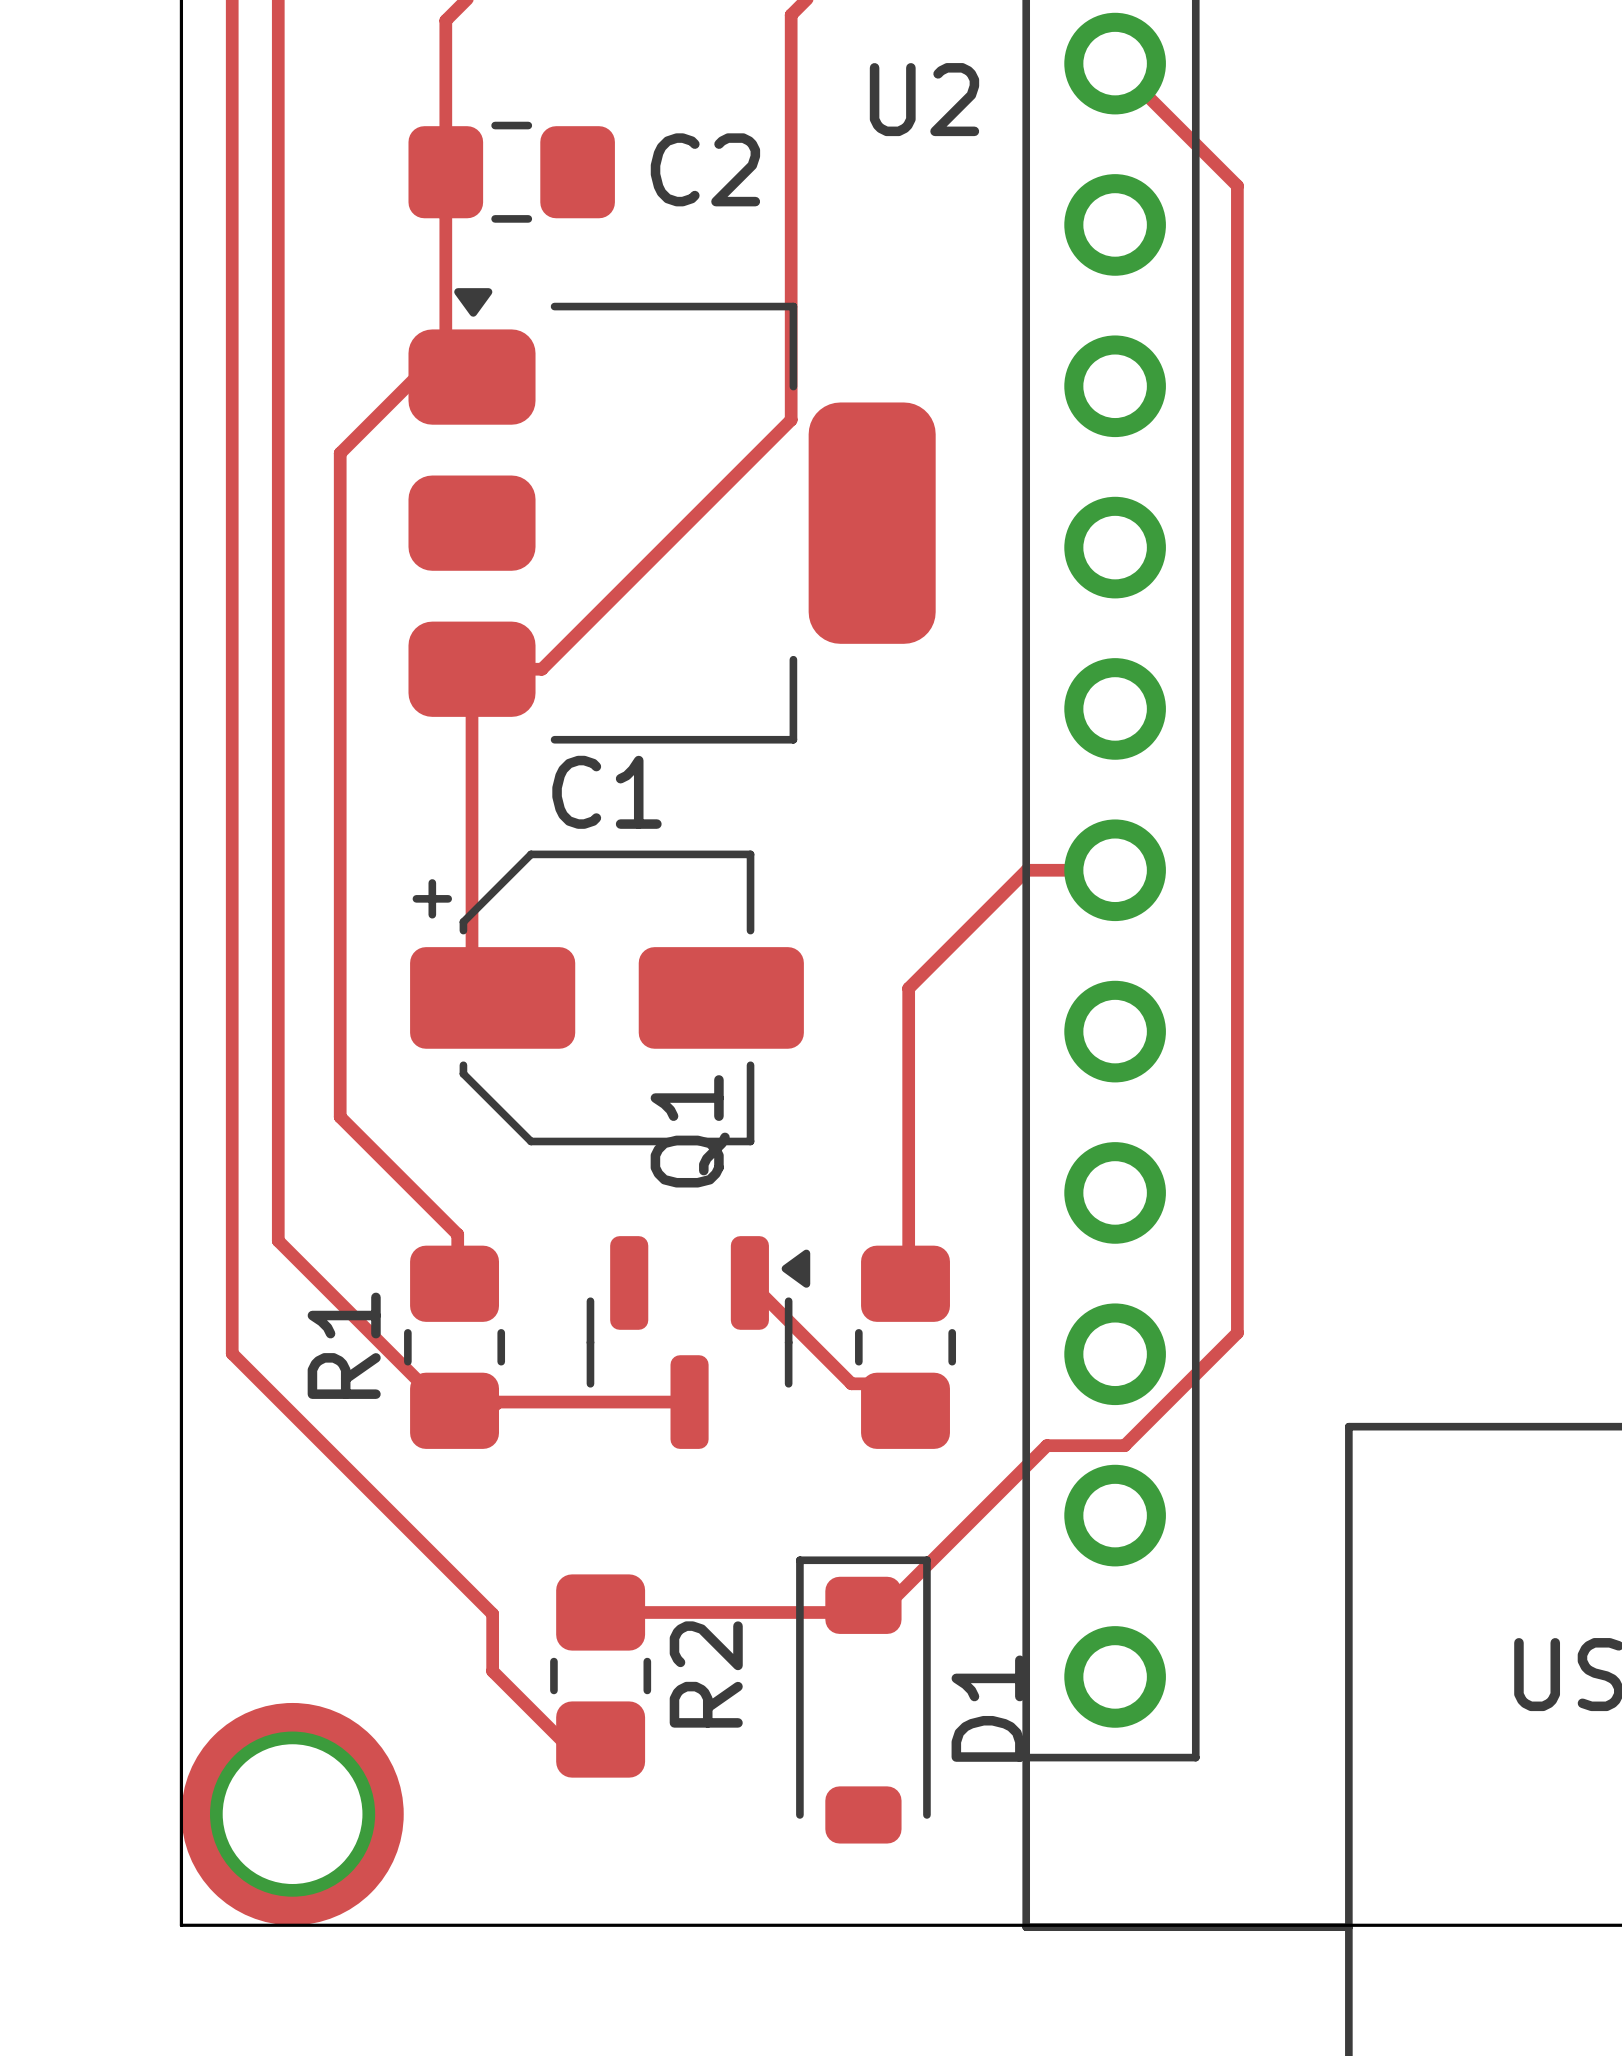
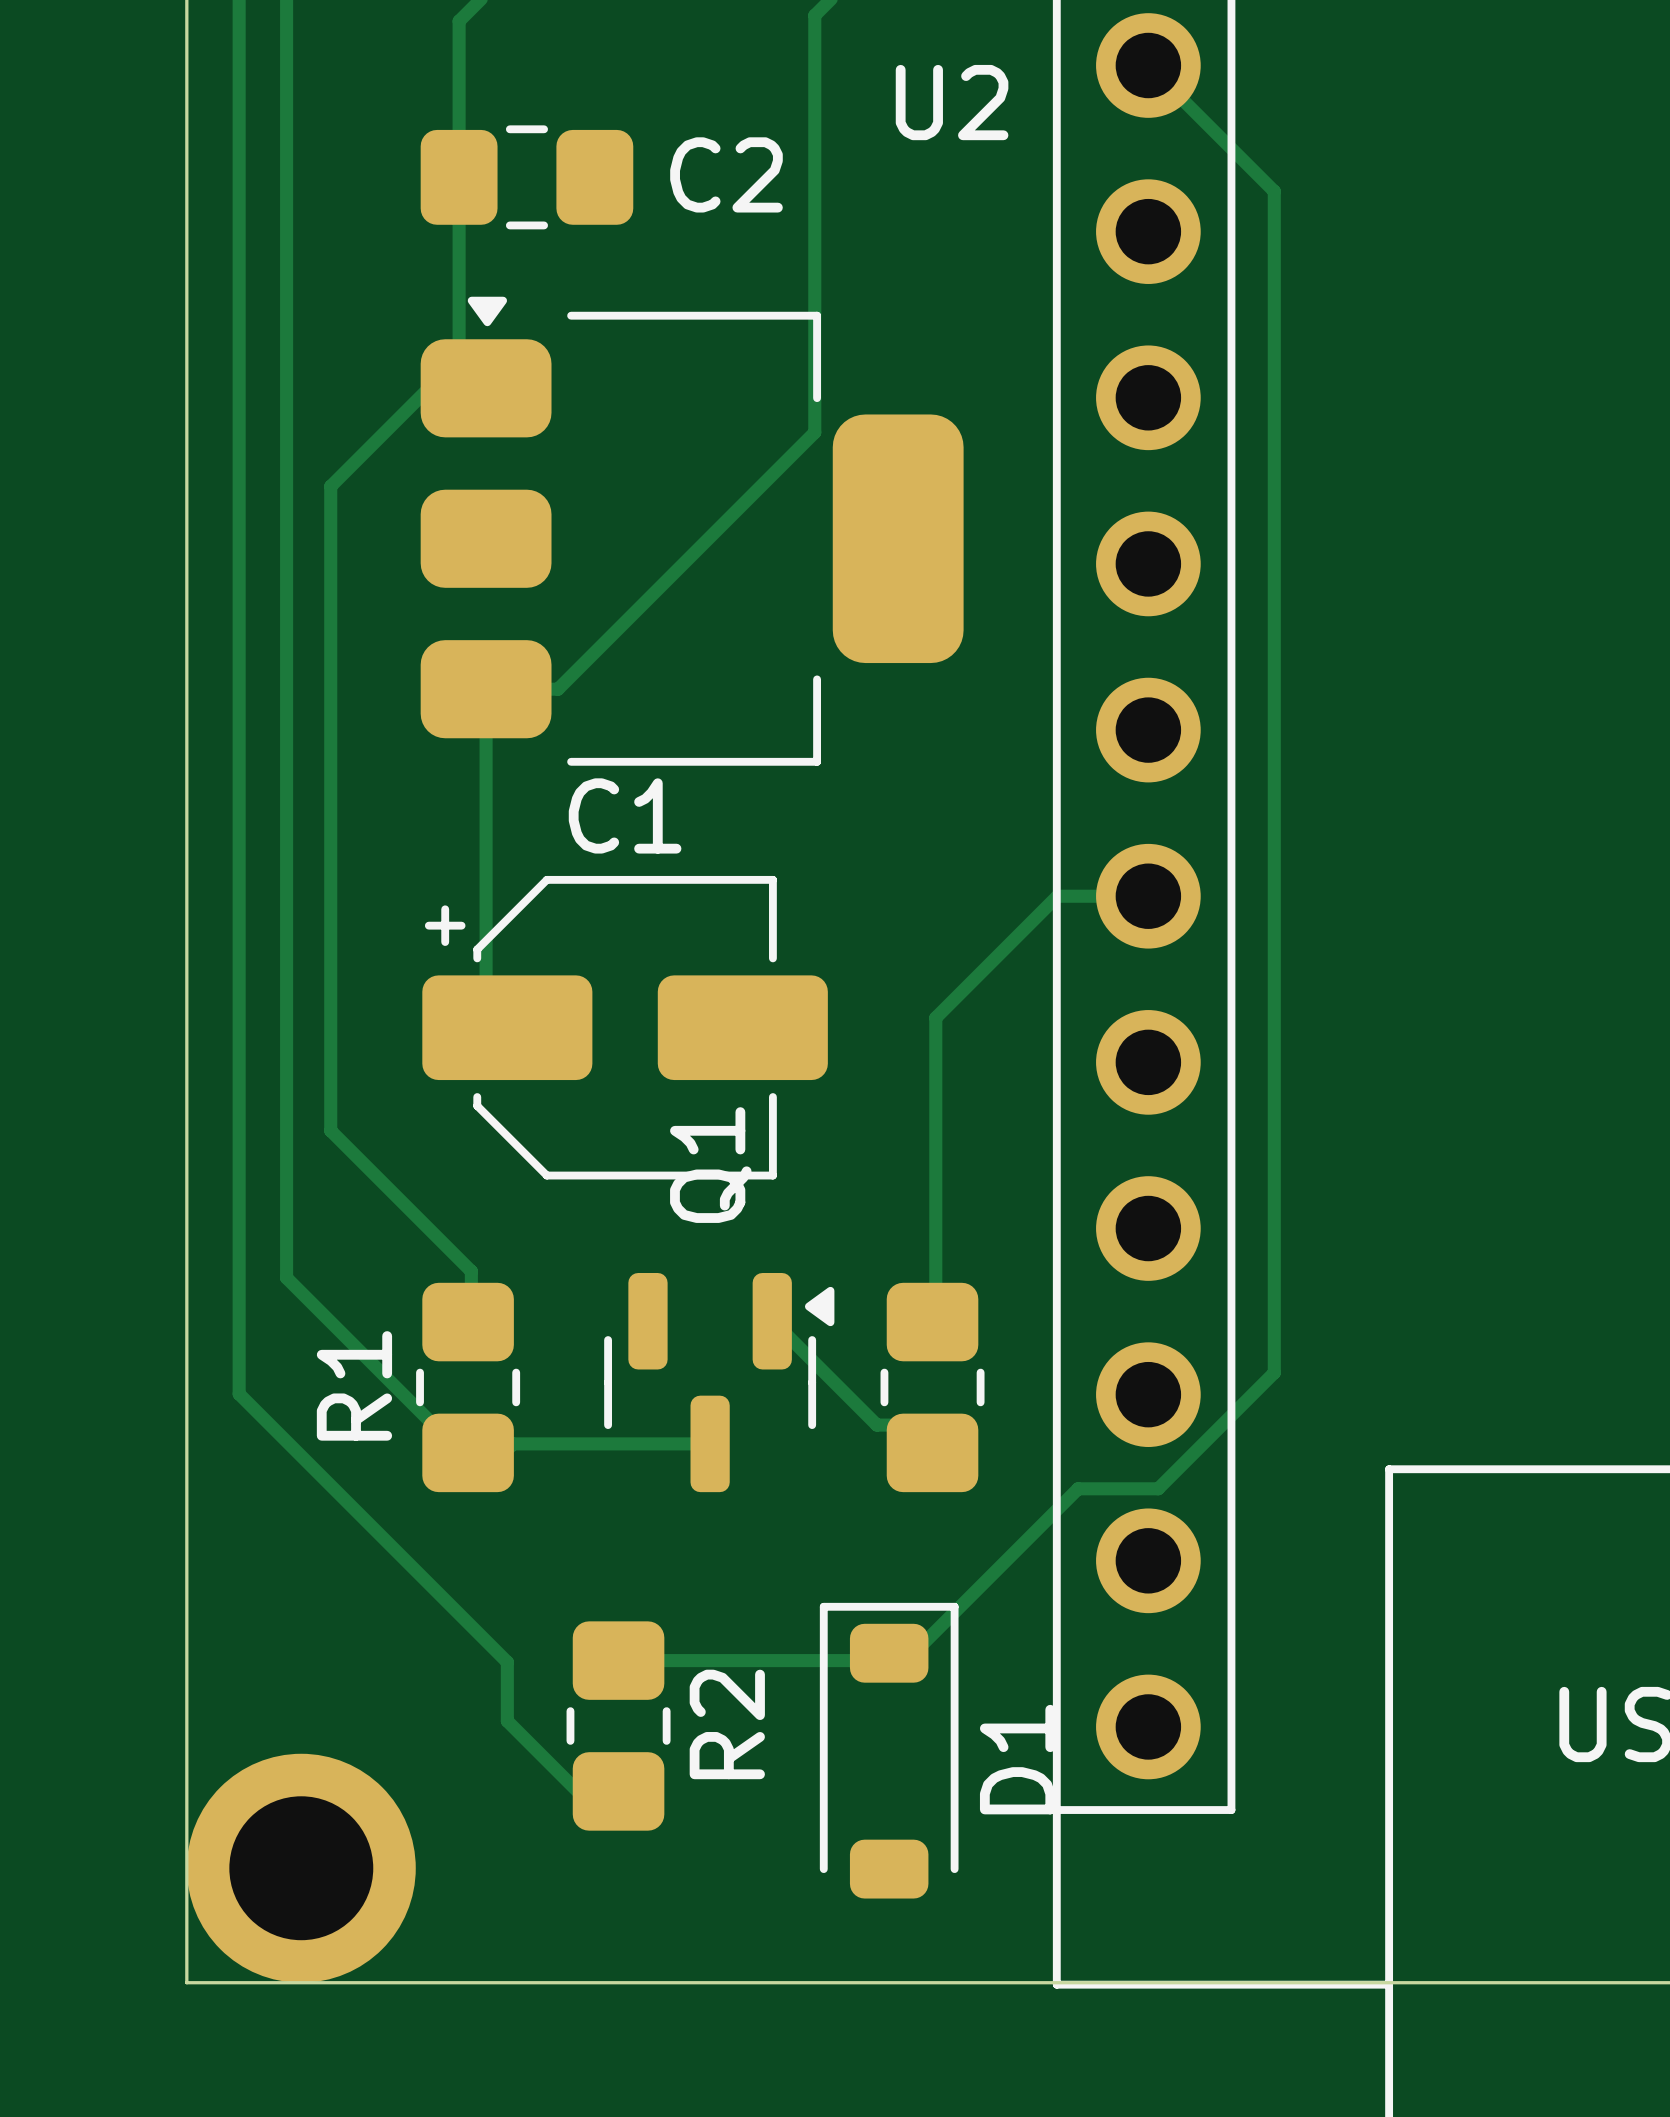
track: (340, 453) (340, 1117) -> (350, 466) (330, 486) (330, 1130) (350, 1150)

